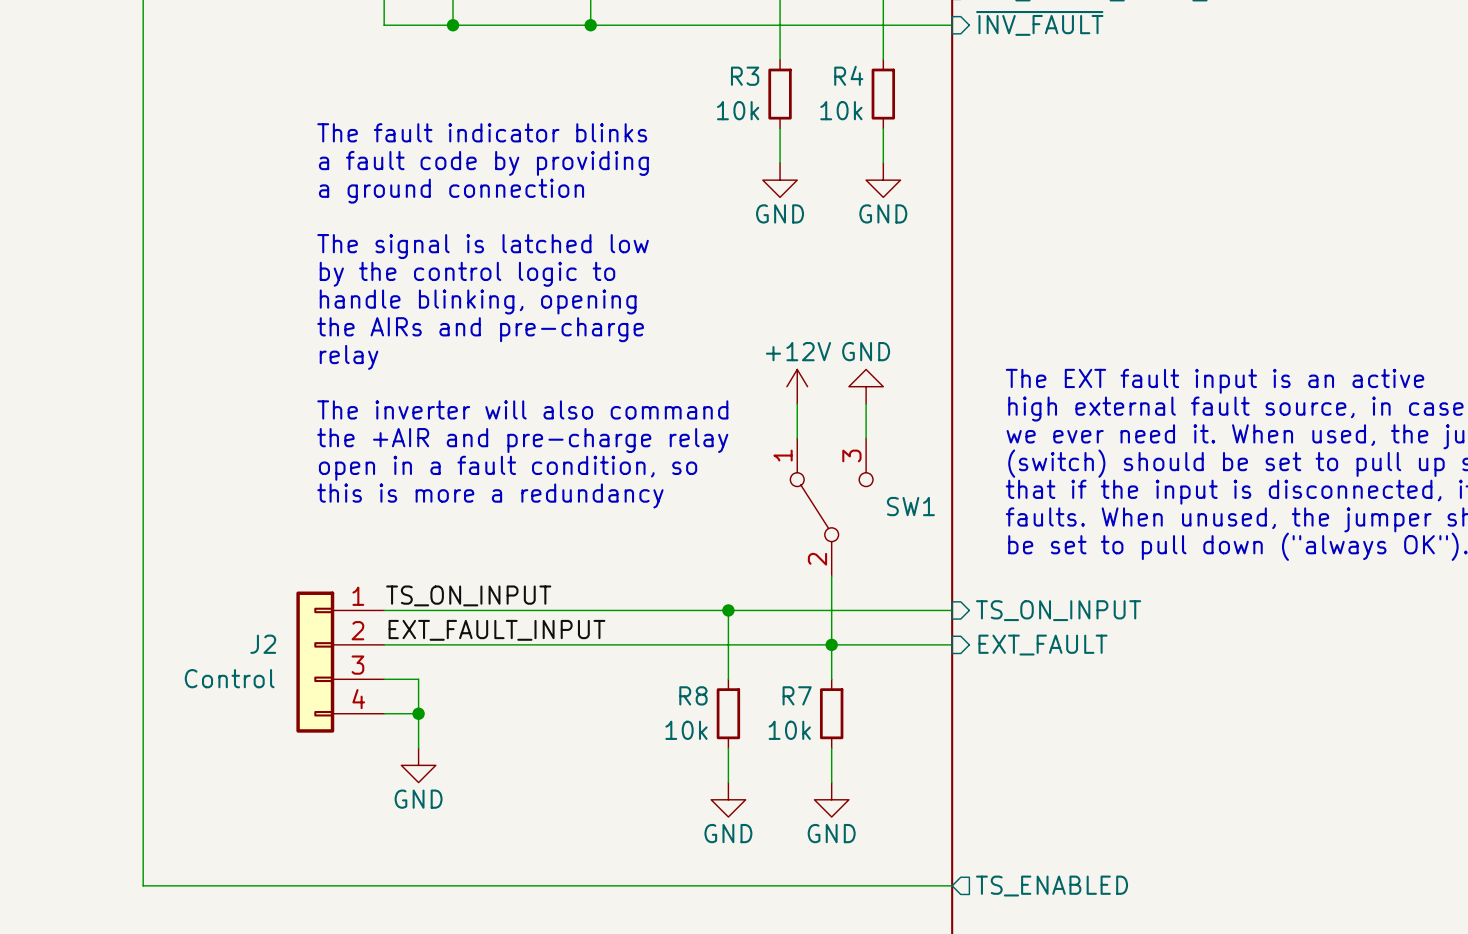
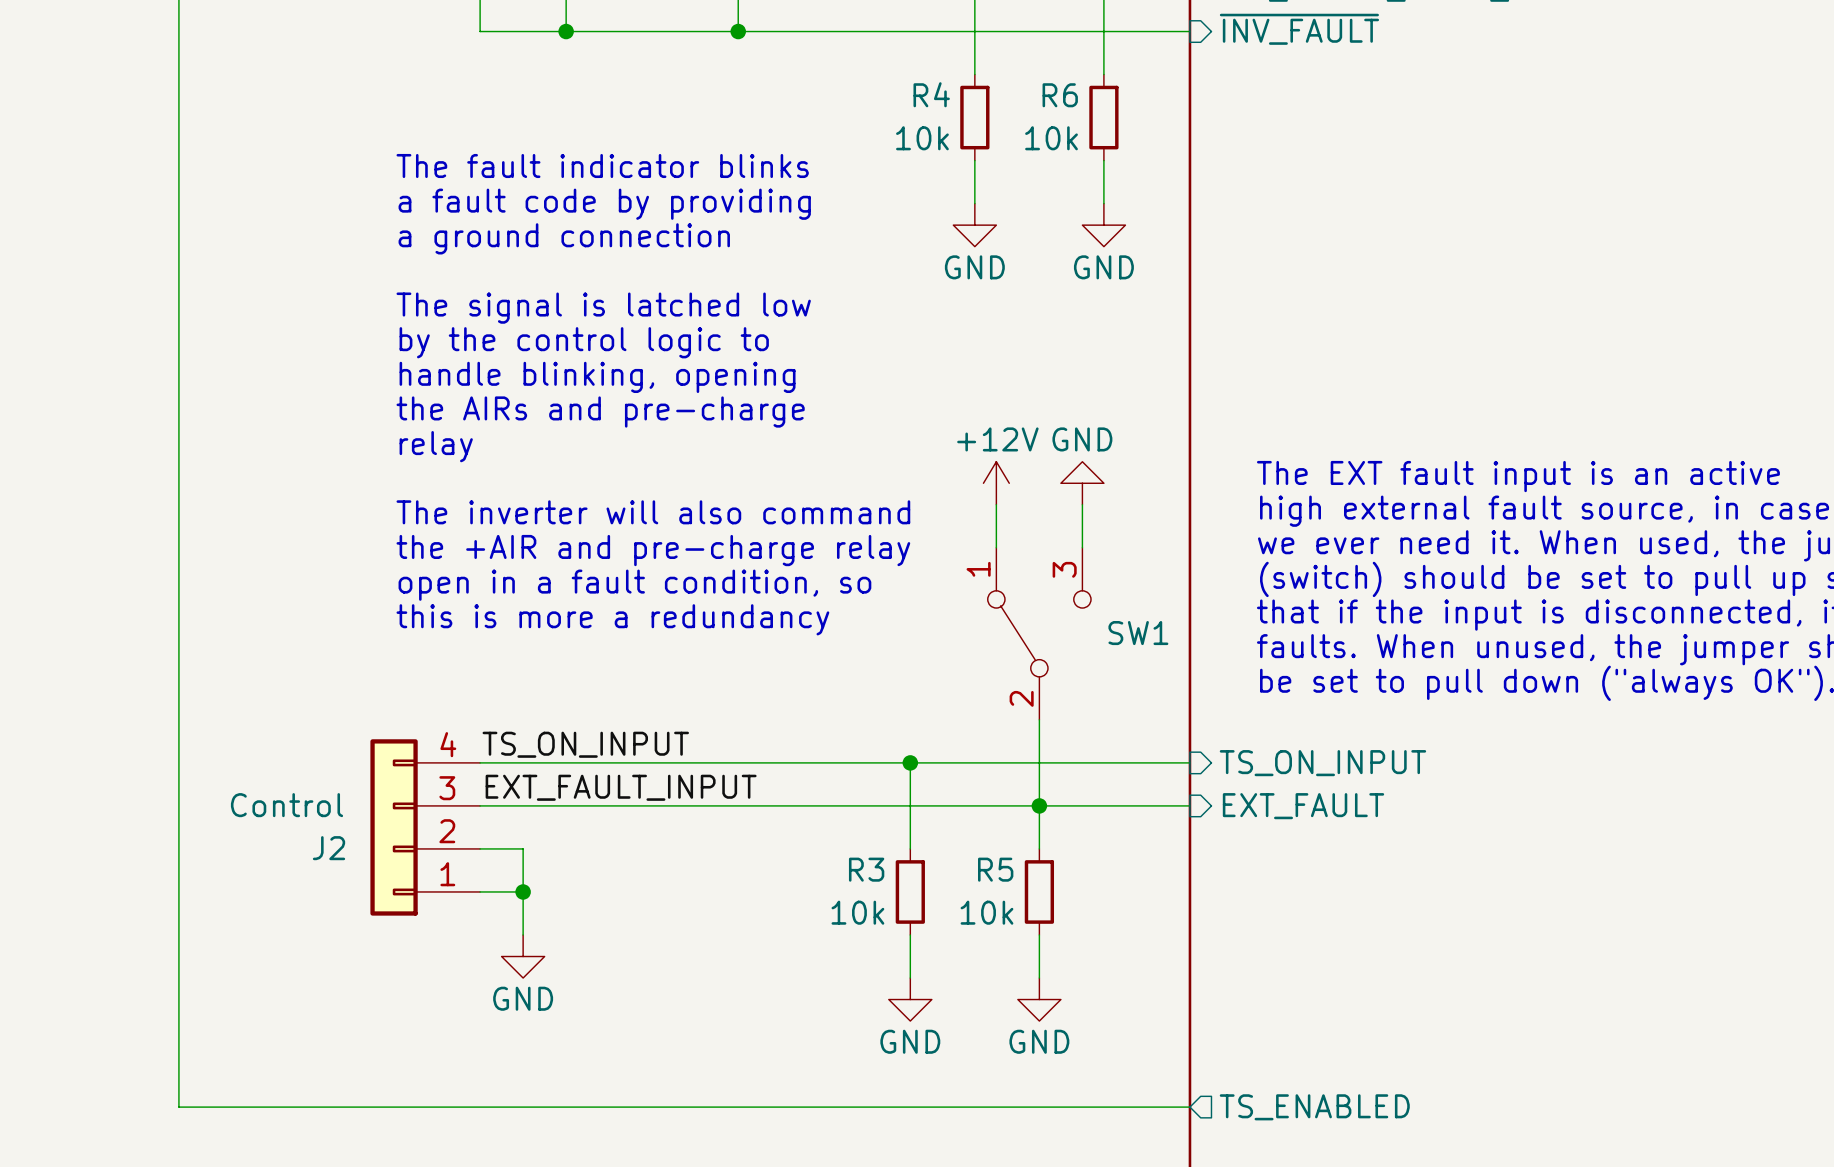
R4 name: R4 (848, 75) -> R6 (1060, 95)
R3 name: R3 (745, 76) -> R4 (931, 94)
J2 flip: as is (315, 662) -> up-down (394, 827)
R8 name: R8 (693, 695) -> R3 (866, 869)
R7 name: R7 (797, 695) -> R5 (995, 869)

